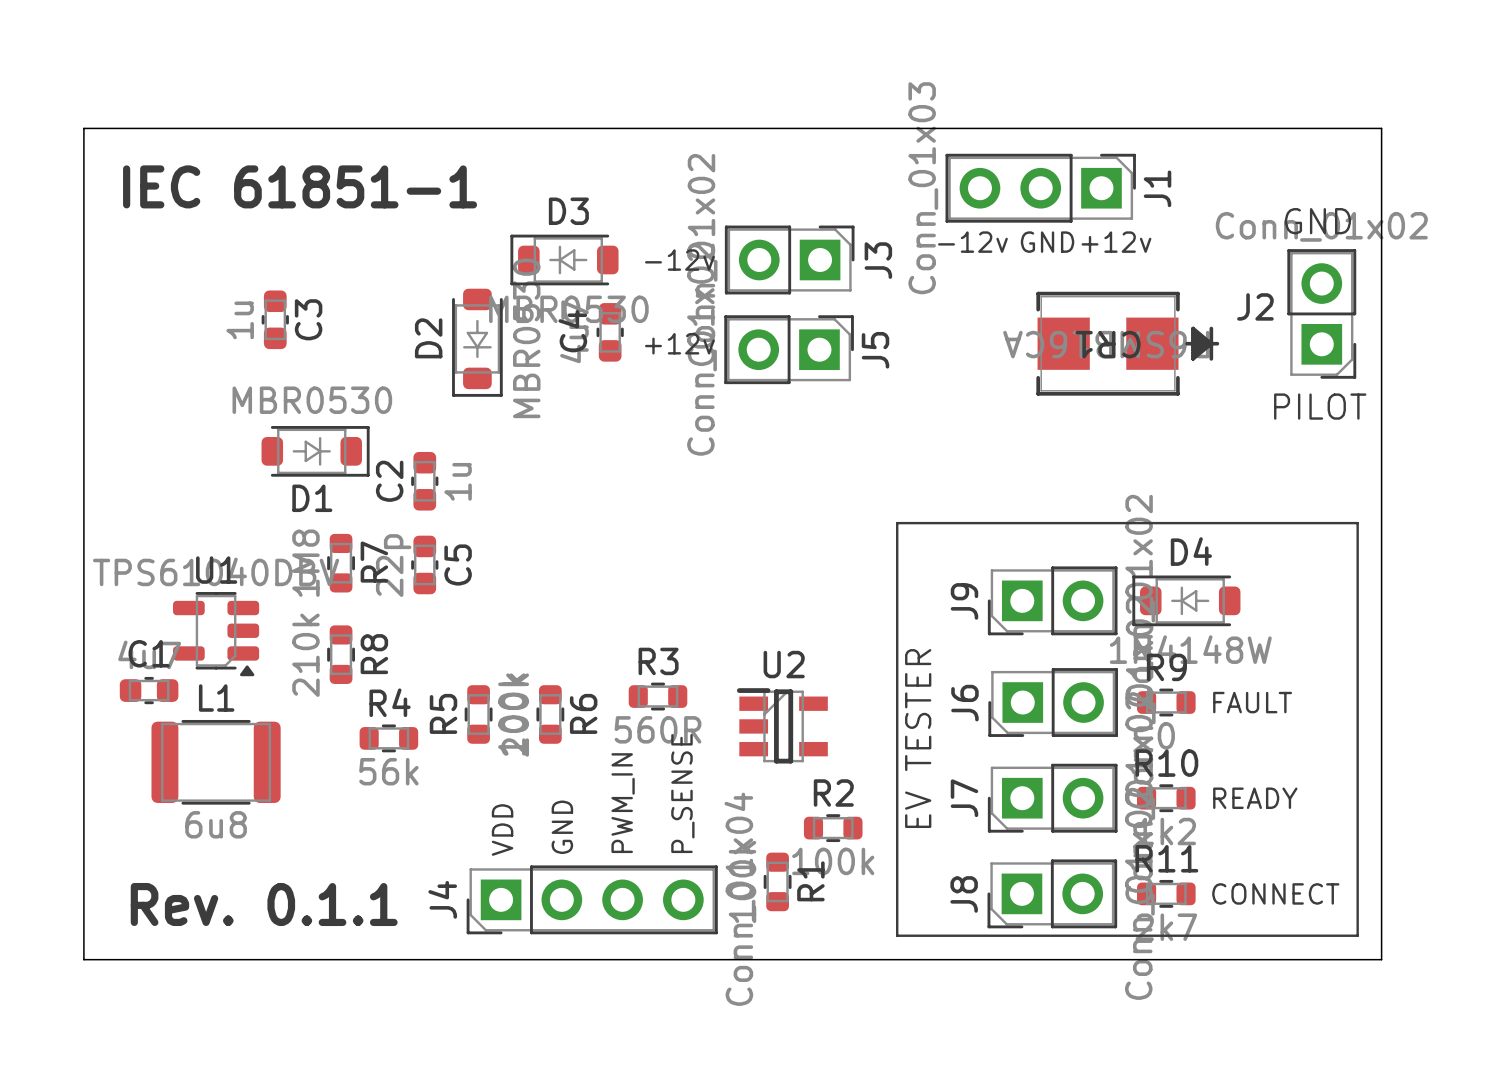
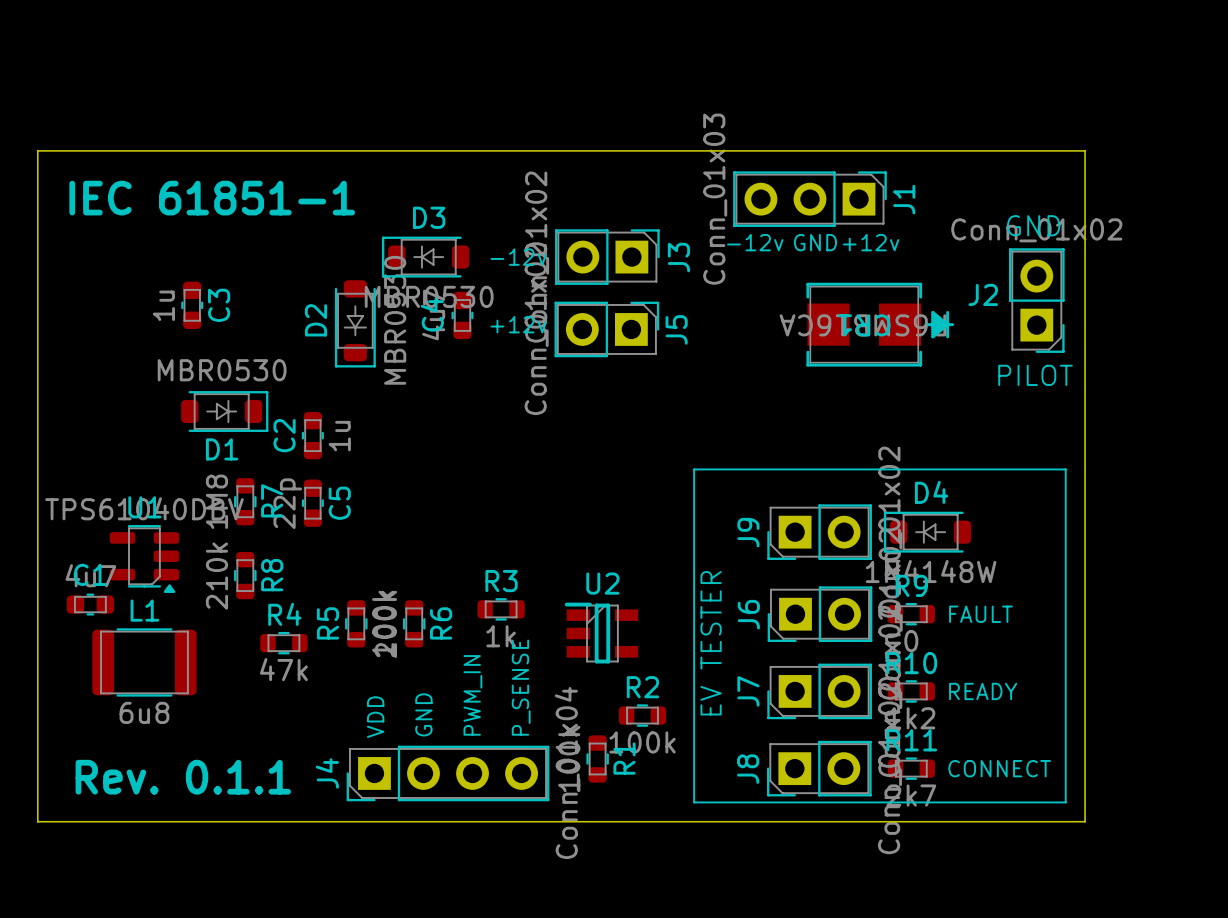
R3 value: 560R (658, 729) -> 1k (501, 636)
R4 value: 56k (388, 771) -> 47k (283, 669)

